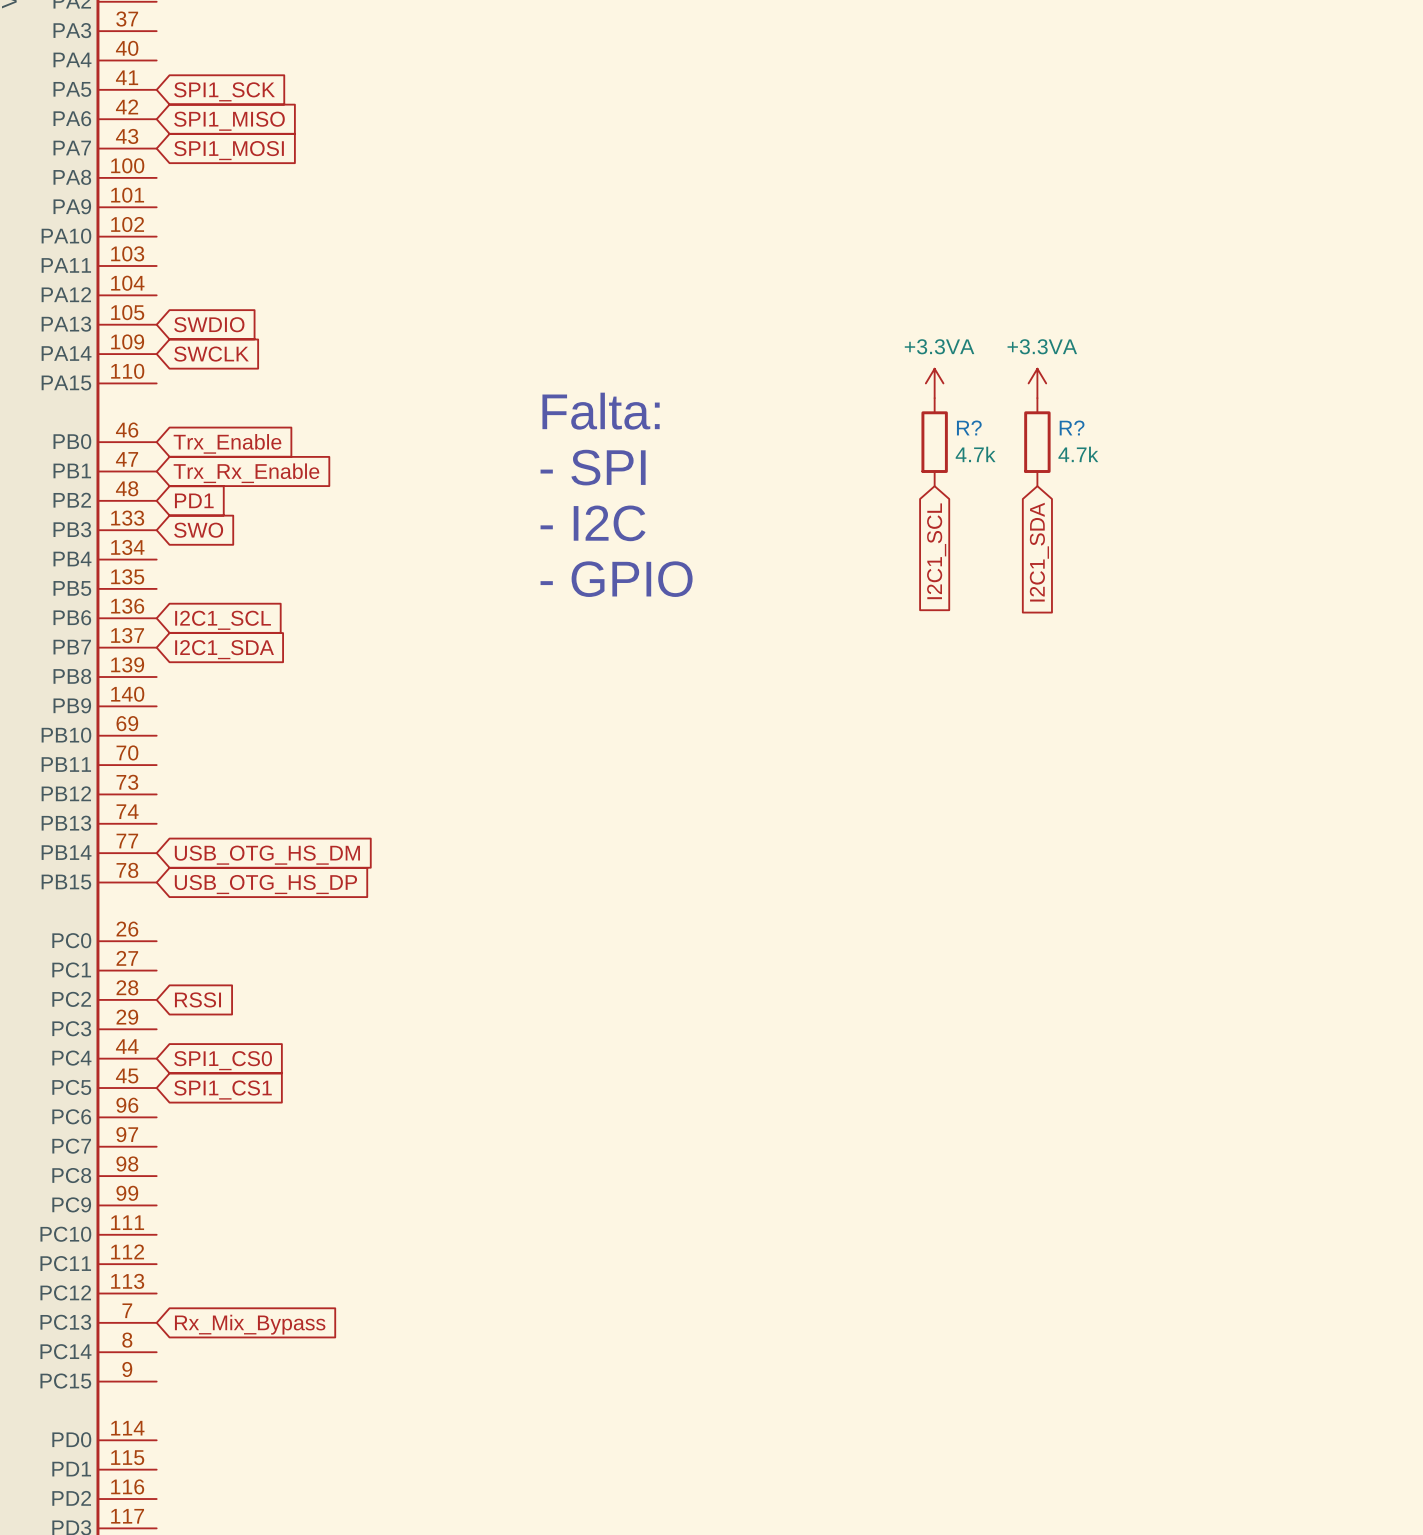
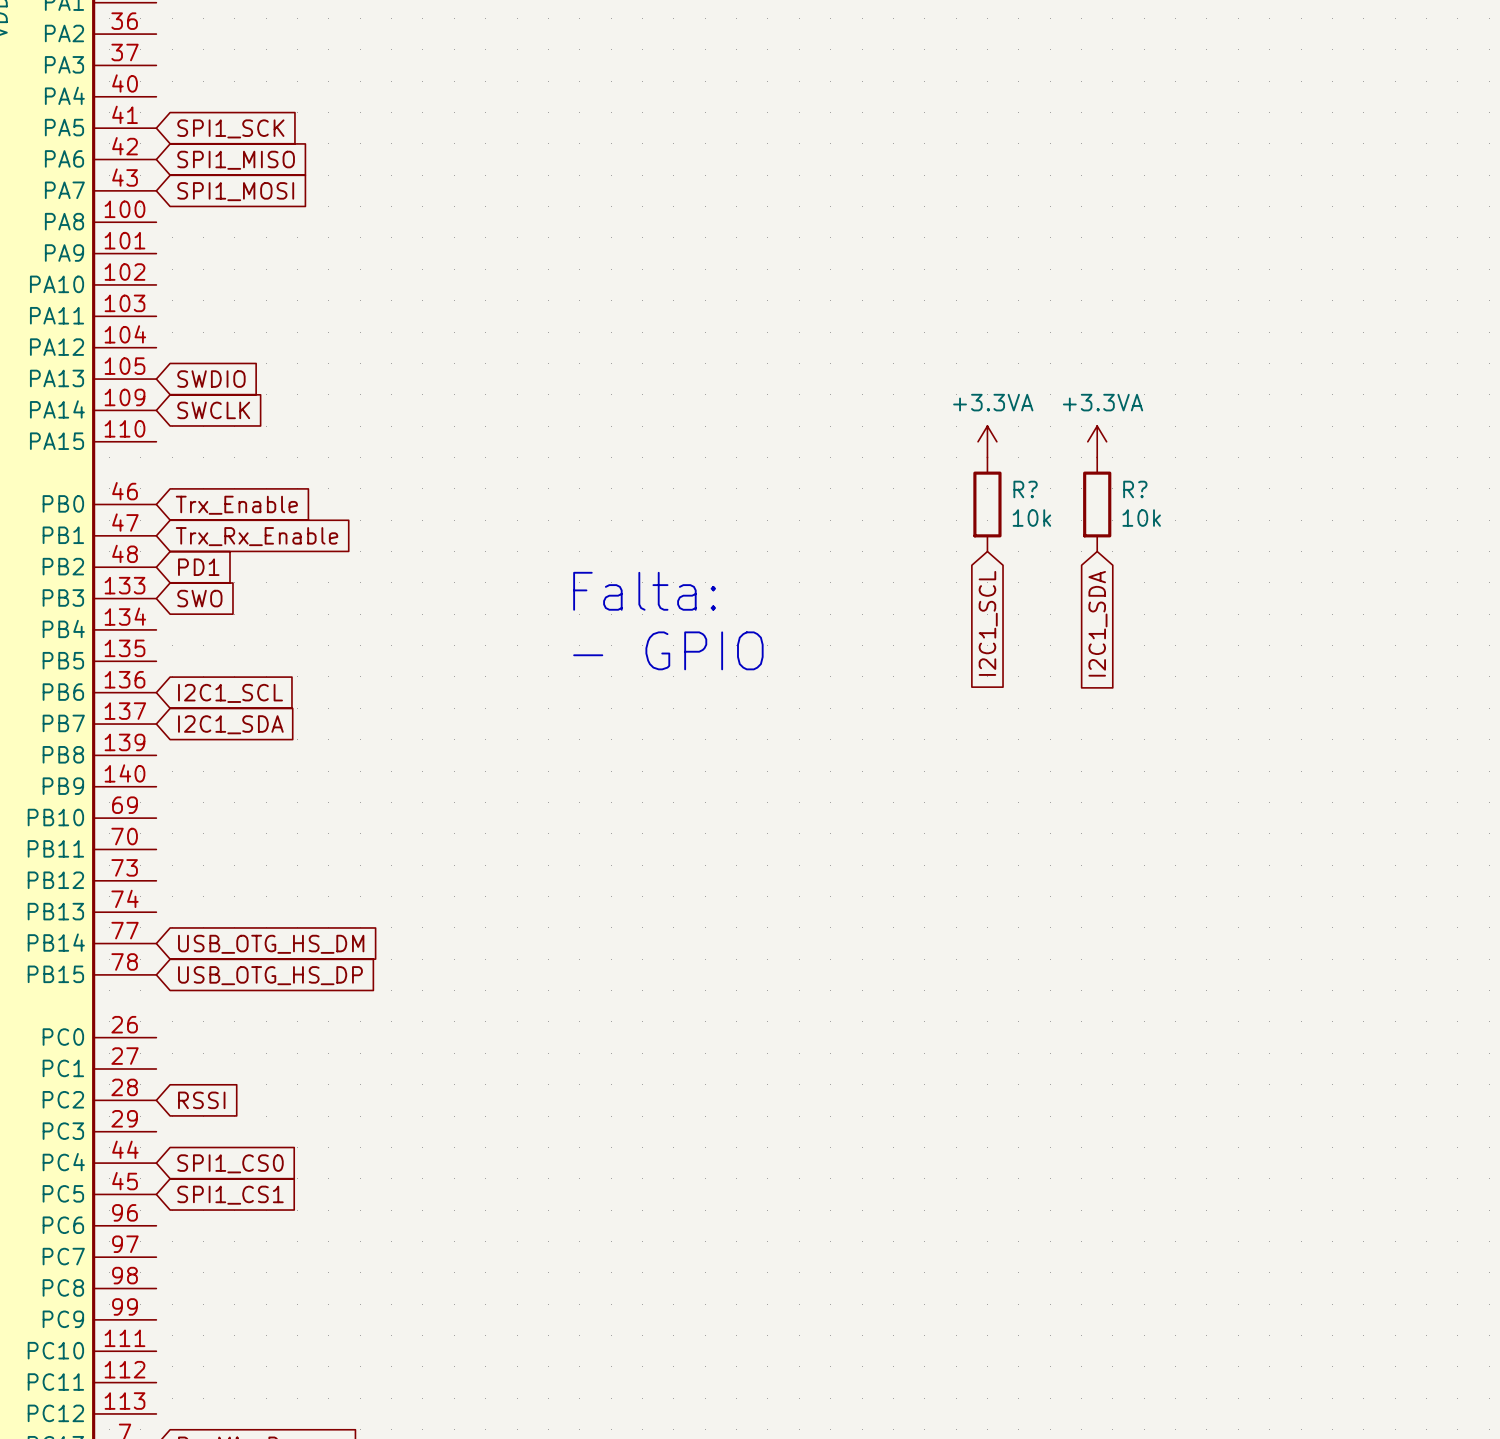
text: Falta: (601, 411) -> none
R? value: 4.7k (975, 454) -> 10k (1031, 518)
R? value: 4.7k (1078, 454) -> 10k (1141, 518)
text: - SPI (593, 467) -> none
text: - I2C (593, 523) -> Falta: (644, 591)

